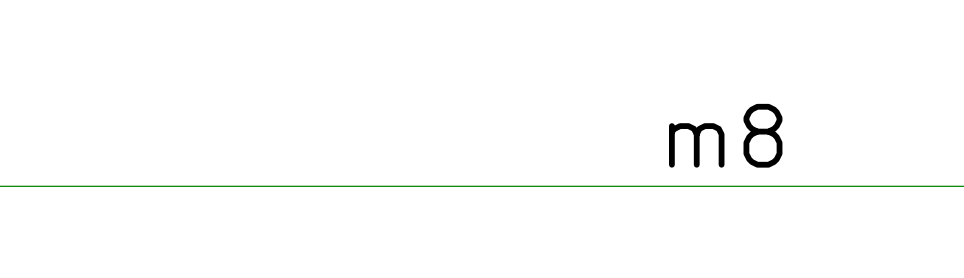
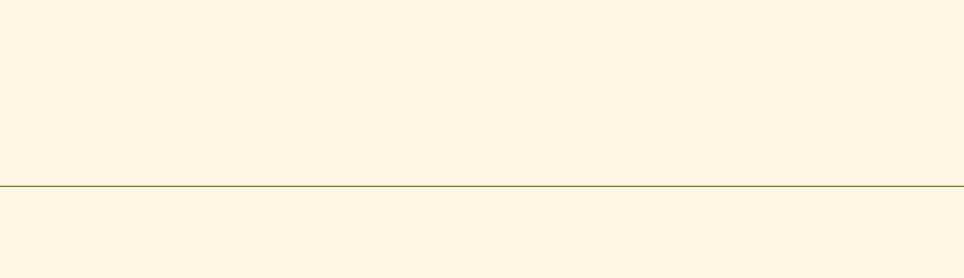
label: m8 (725, 135) -> none

